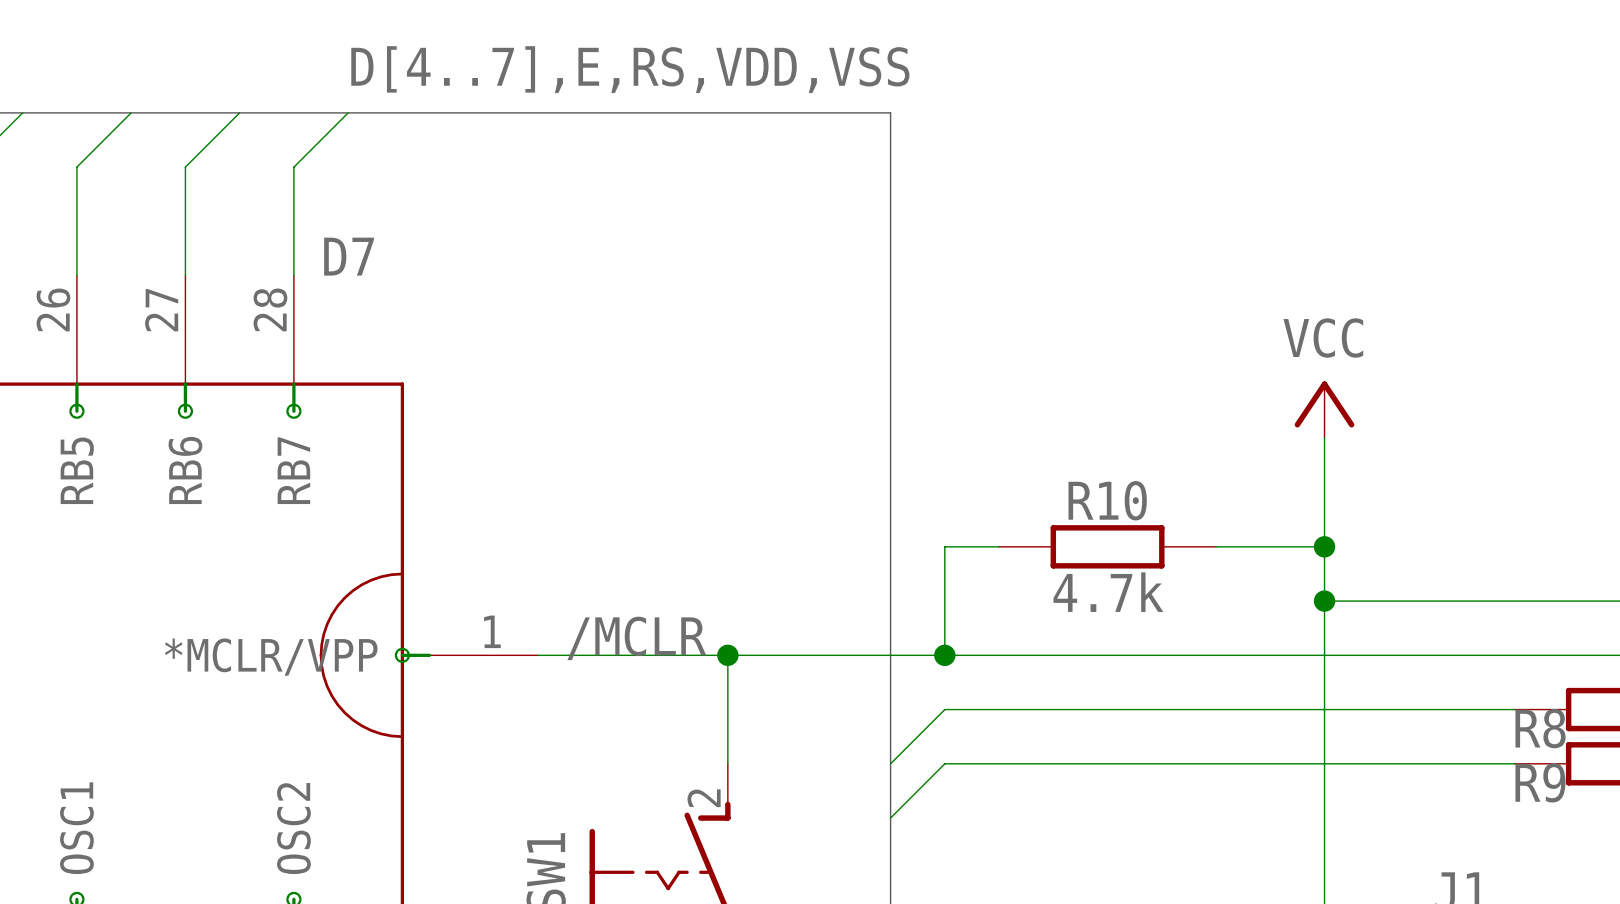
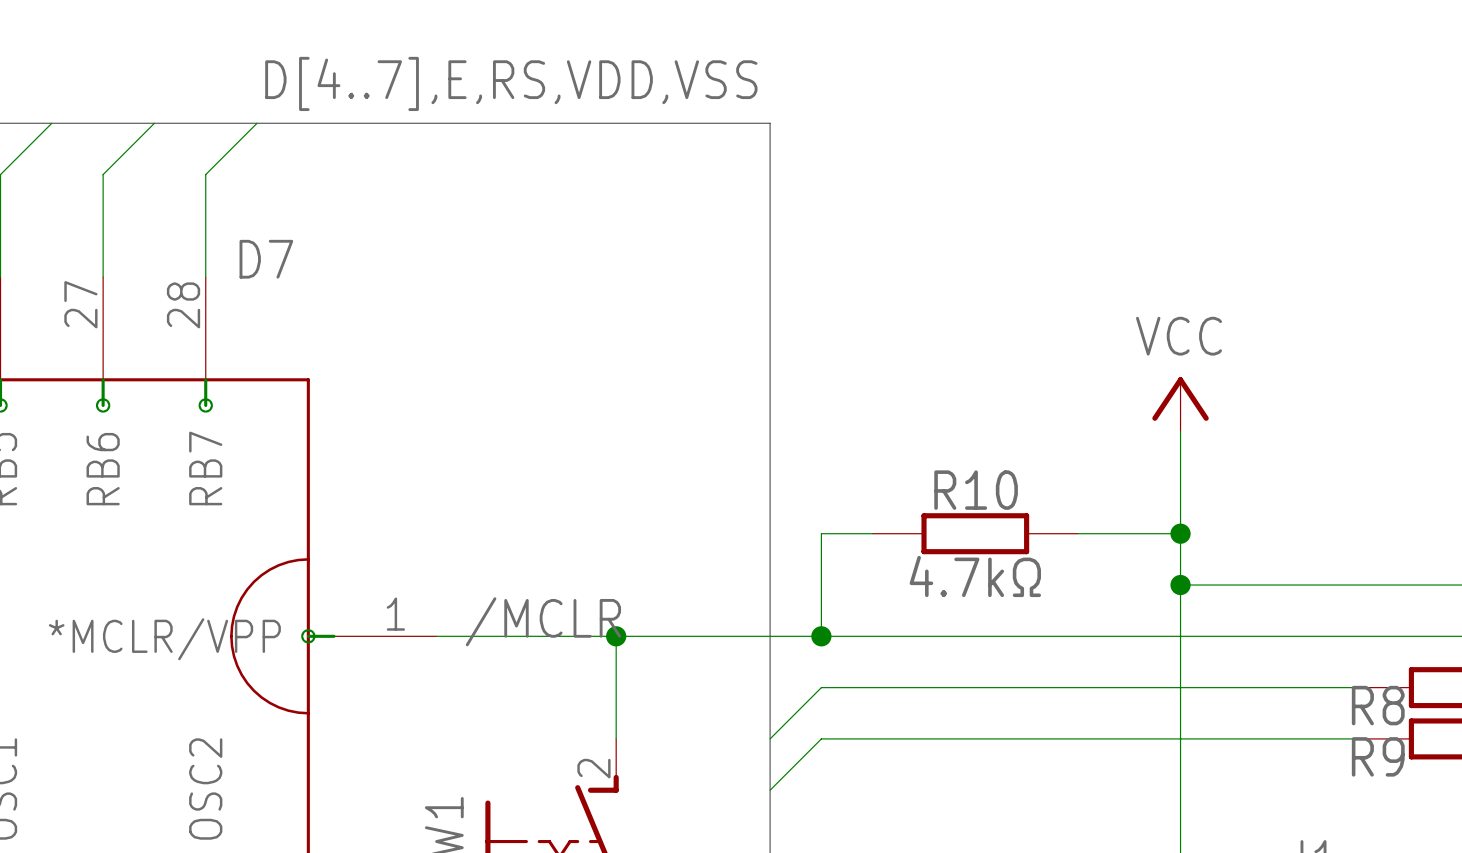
R10 value: 4.7k (1108, 592) -> 4.7kΩ (975, 576)

